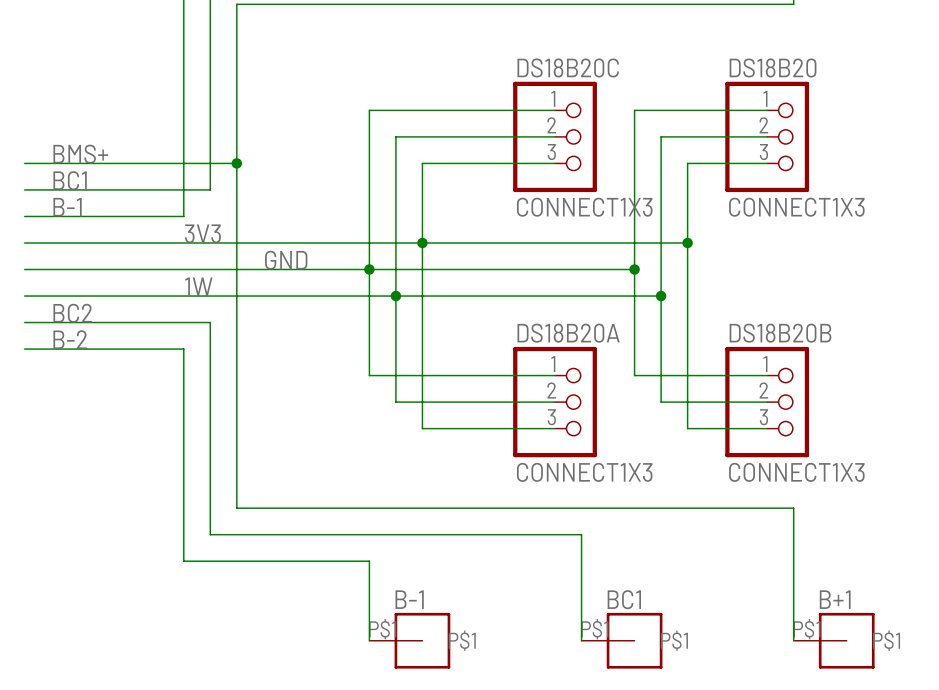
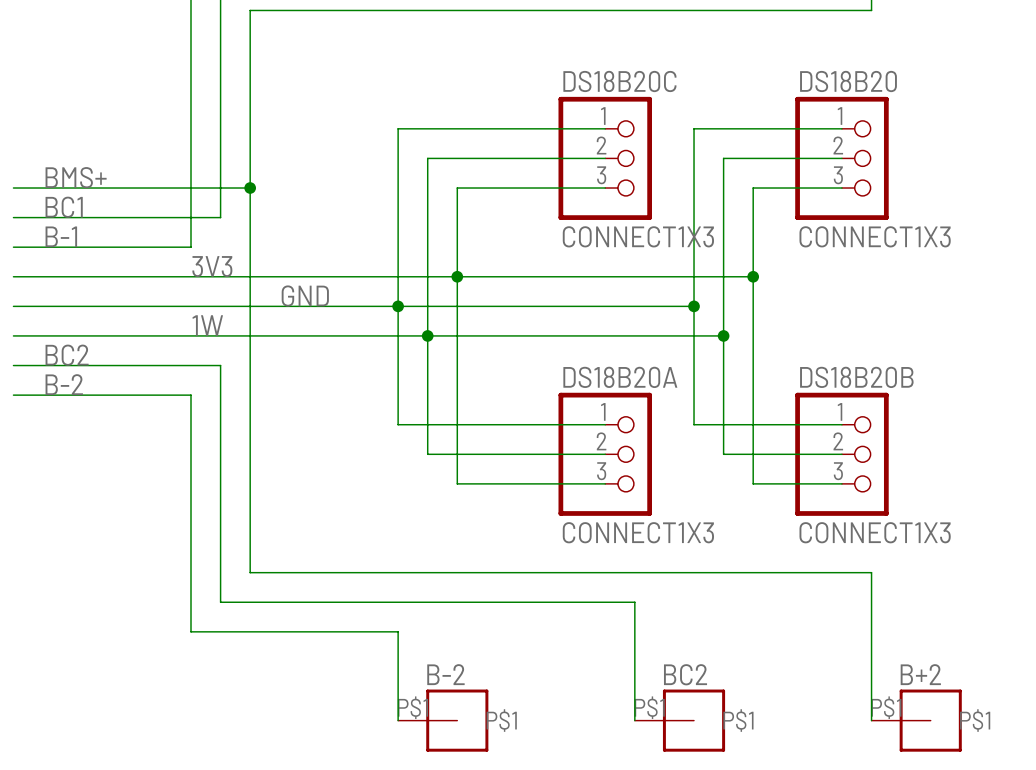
B-1 name: B-1 (409, 599) -> B-2 (445, 674)
BC1 name: BC1 (624, 599) -> BC2 (685, 674)
B+1 name: B+1 (835, 599) -> B+2 (920, 674)

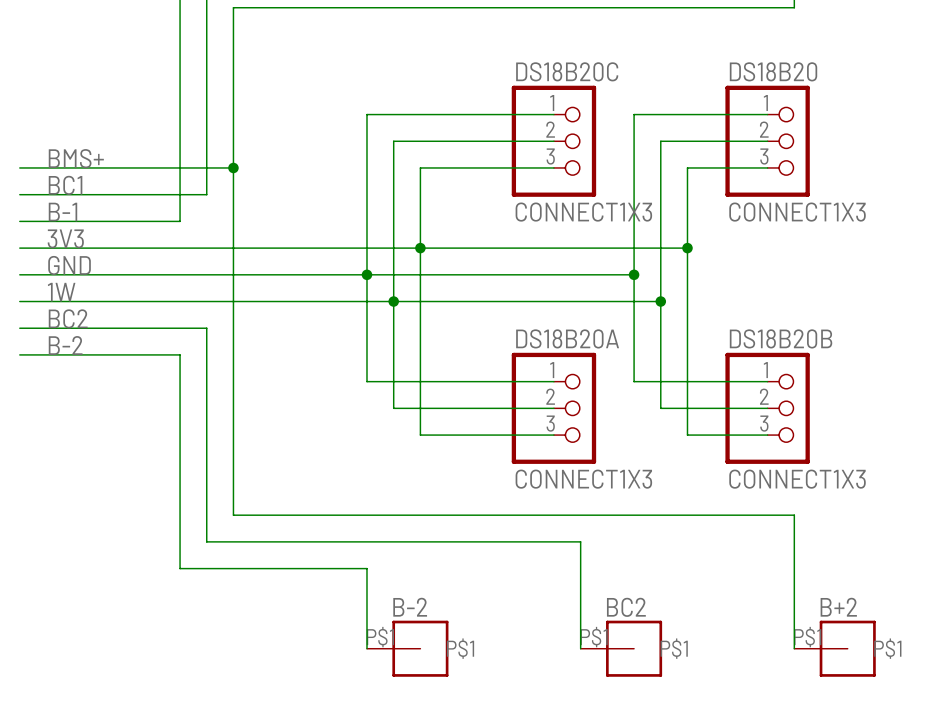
label position: 3V3 (212, 266) -> 3V3 (65, 238)
label position: GND (305, 296) -> GND (69, 265)
label position: 1W (207, 325) -> 1W (61, 292)

